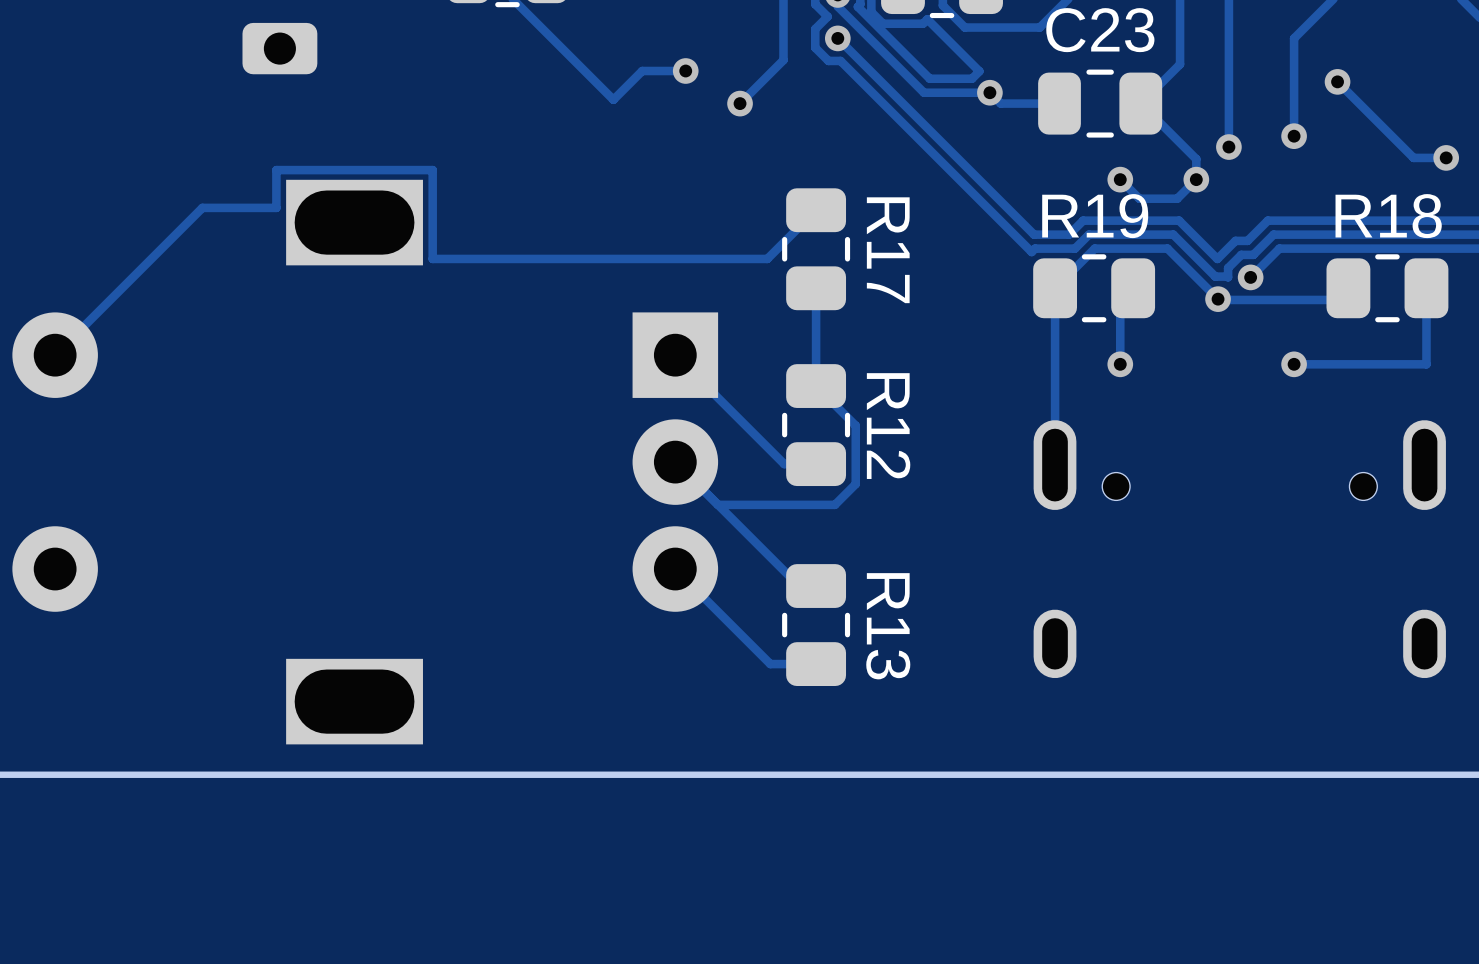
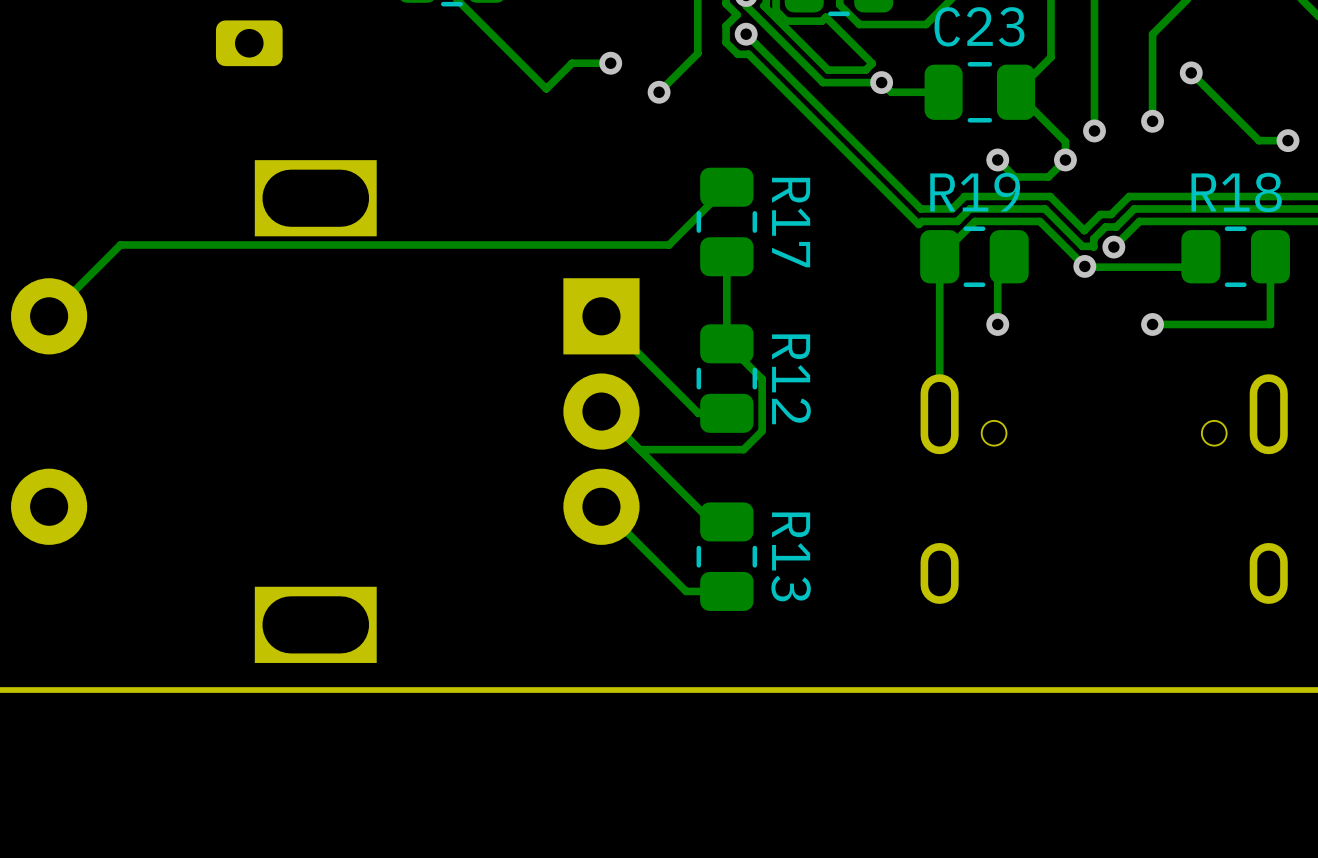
track: (767, 258) (432, 258) (432, 170) (276, 170) (276, 207) (202, 207) (135, 275) -> (683, 230) (669, 244) (120, 244)

